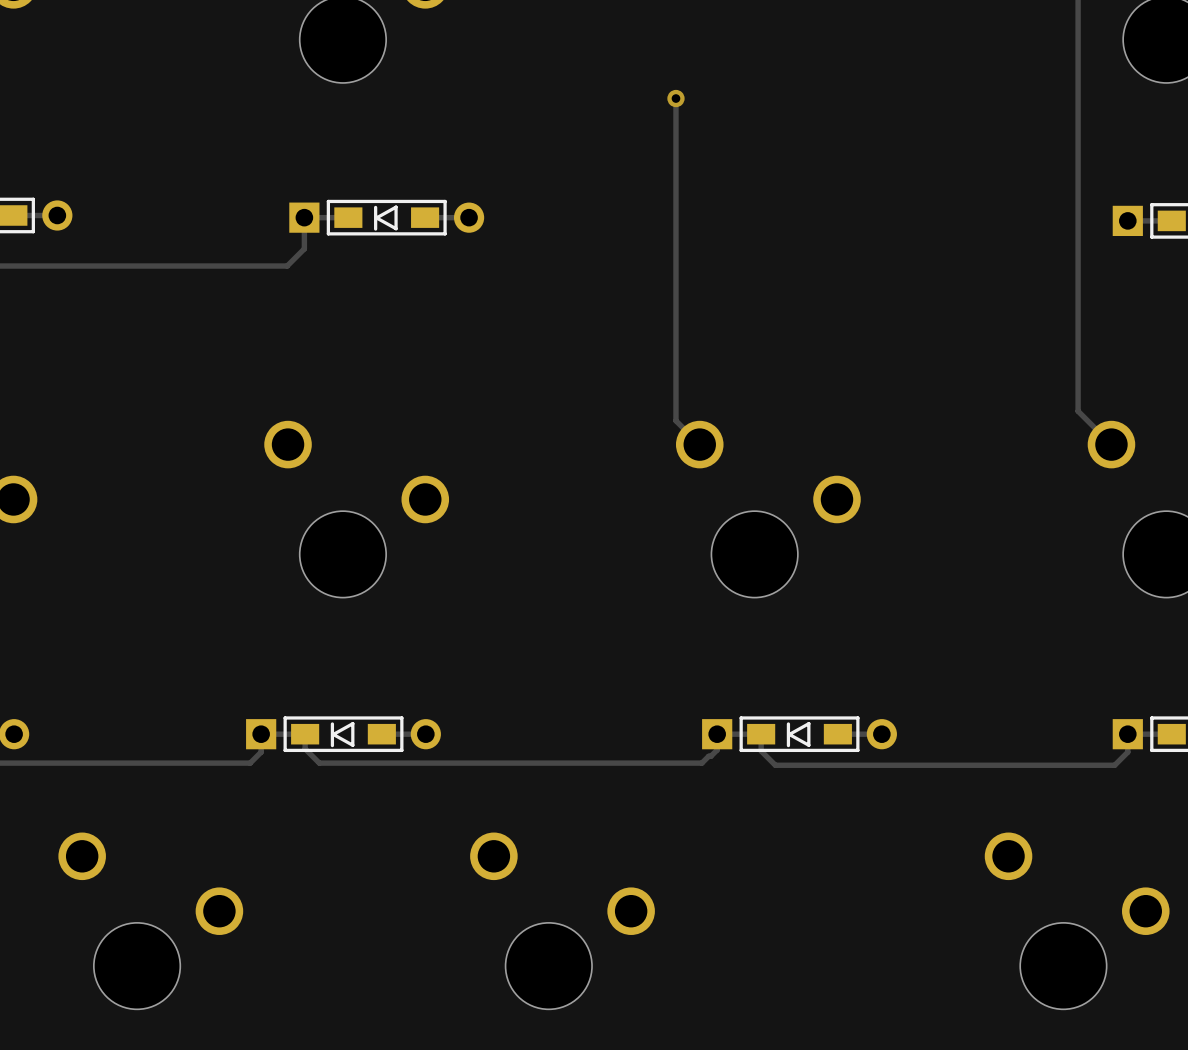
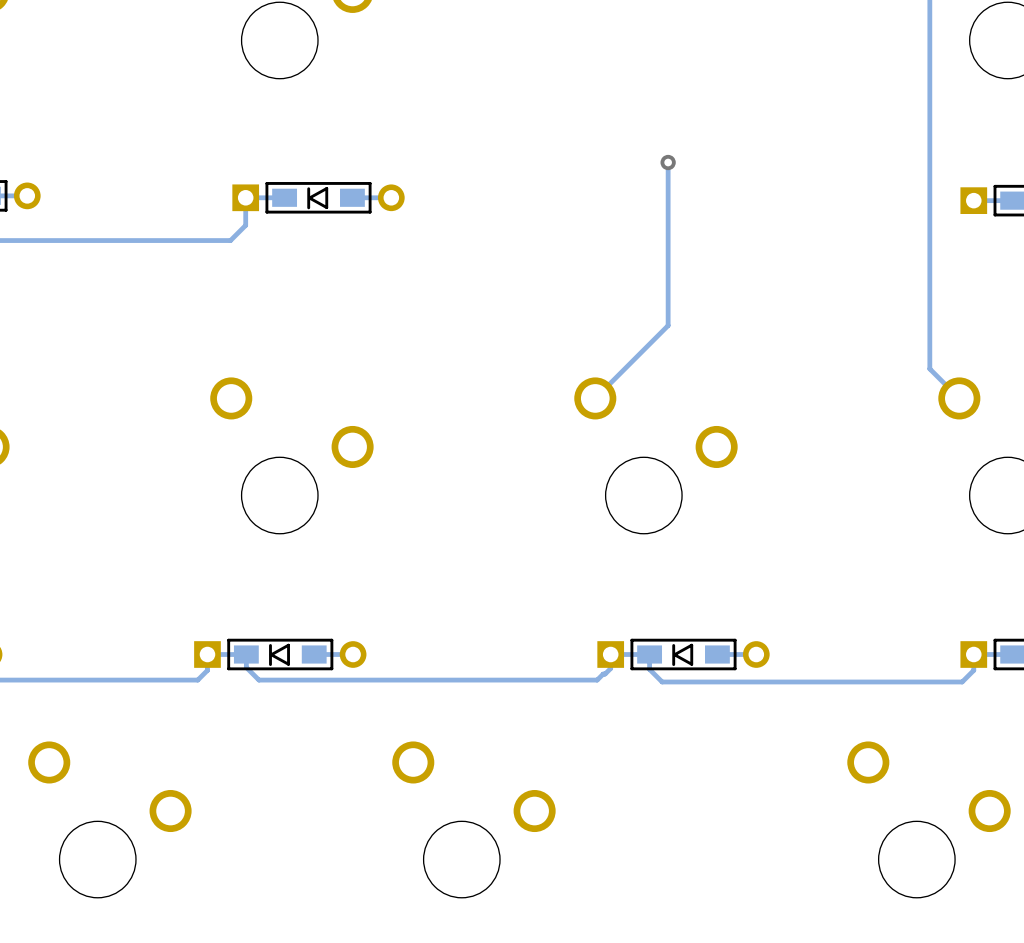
track: (675, 98) (675, 420) (699, 444) -> (668, 162) (668, 325) (595, 398)
via: (675, 98) -> none
via: none -> (668, 162)

